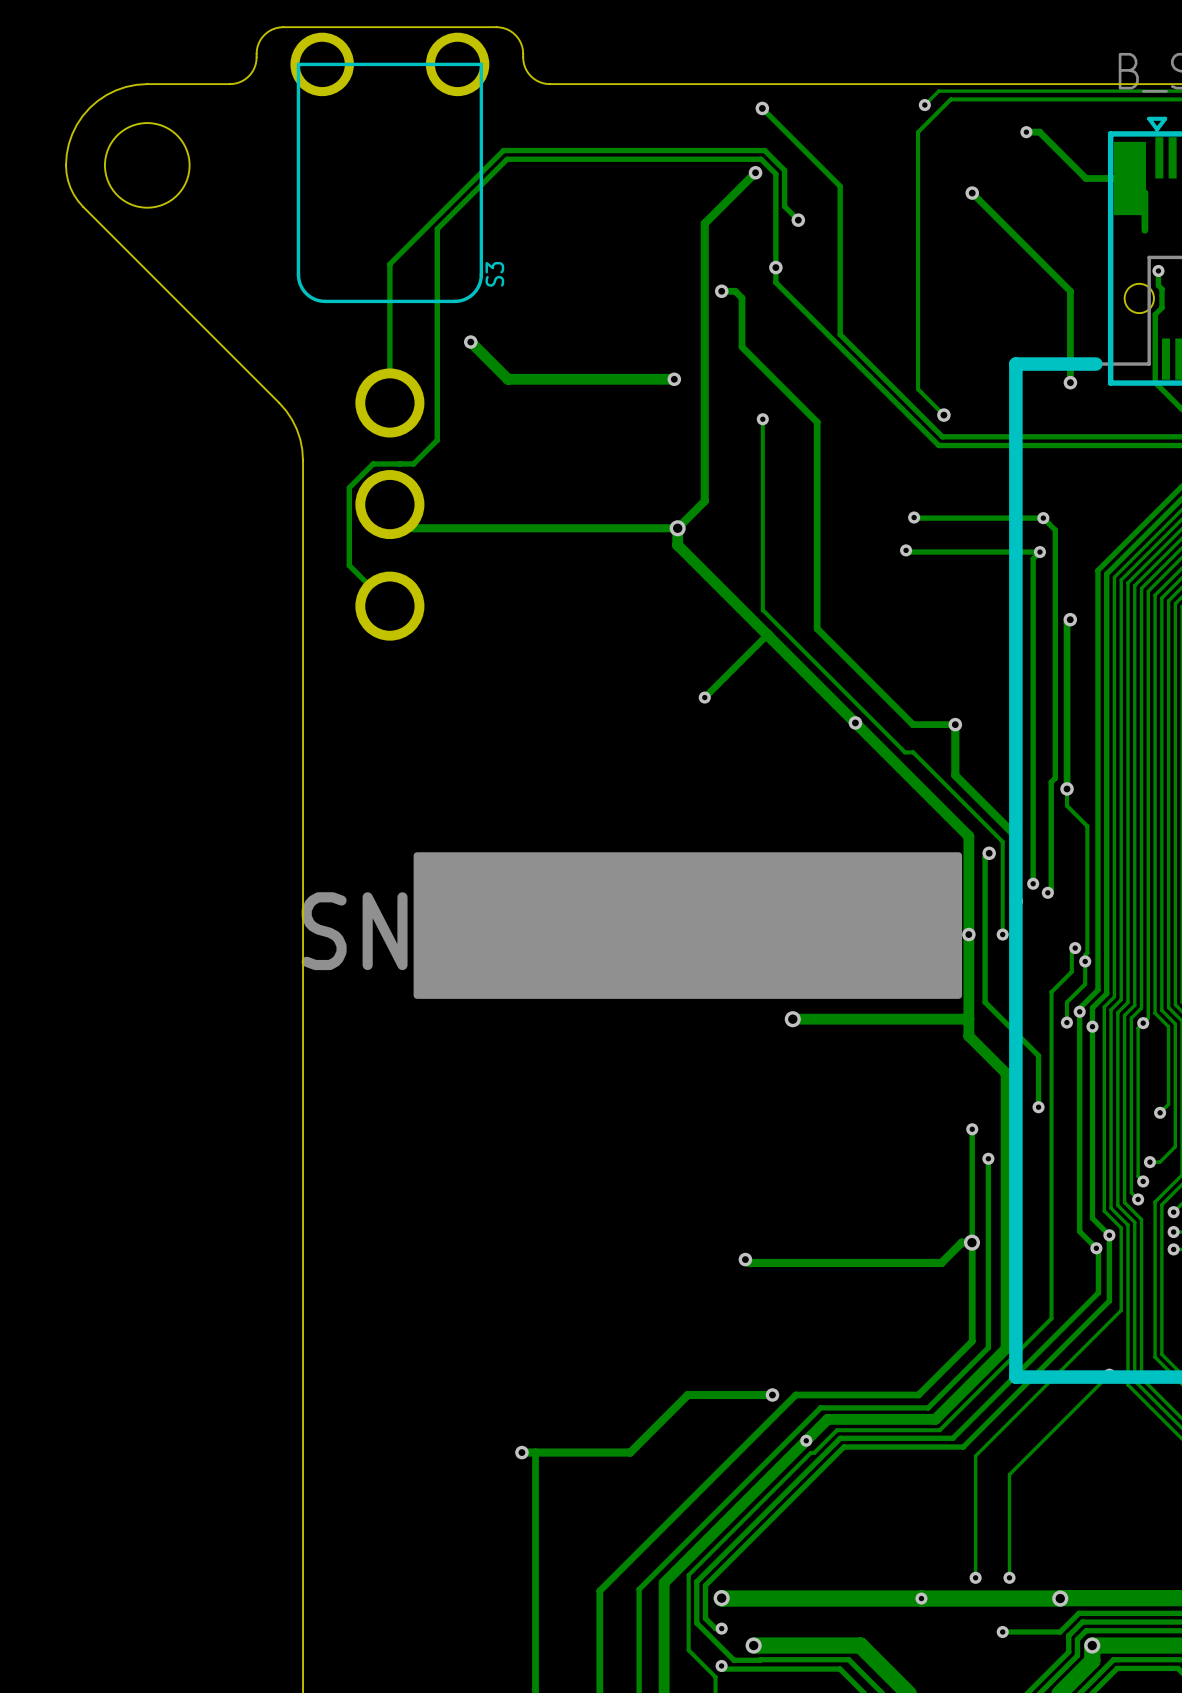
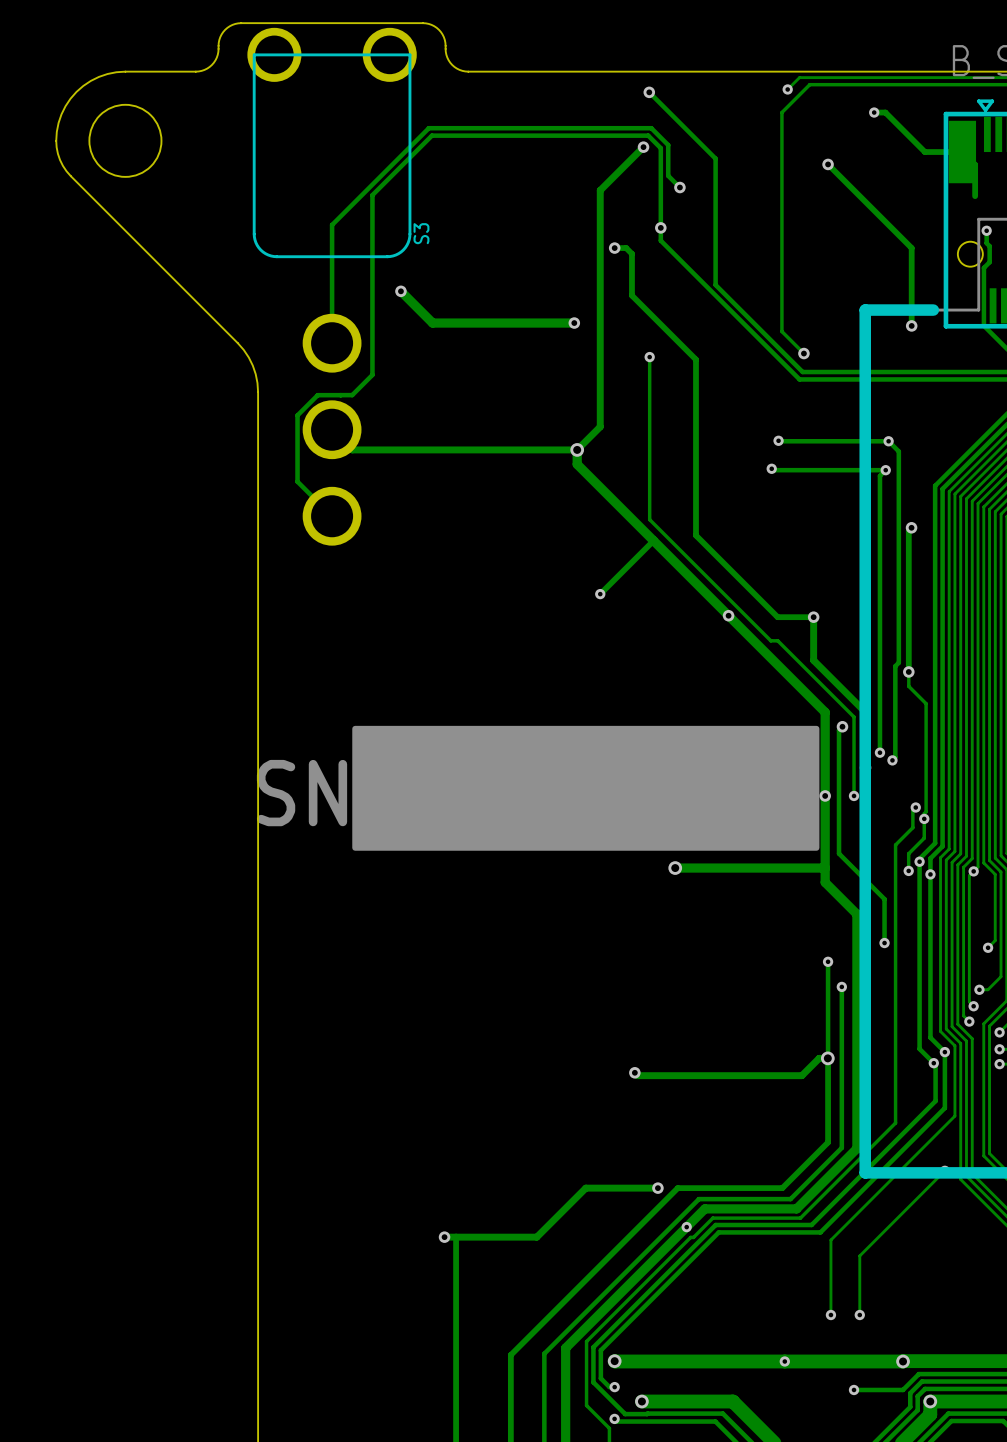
track: (975, 1543) (975, 1577) -> none
via: none -> (830, 1315)
track: (1009, 1543) (1009, 1577) -> none
via: none -> (859, 1315)
via: (975, 1577) -> none
via: (1009, 1577) -> none

